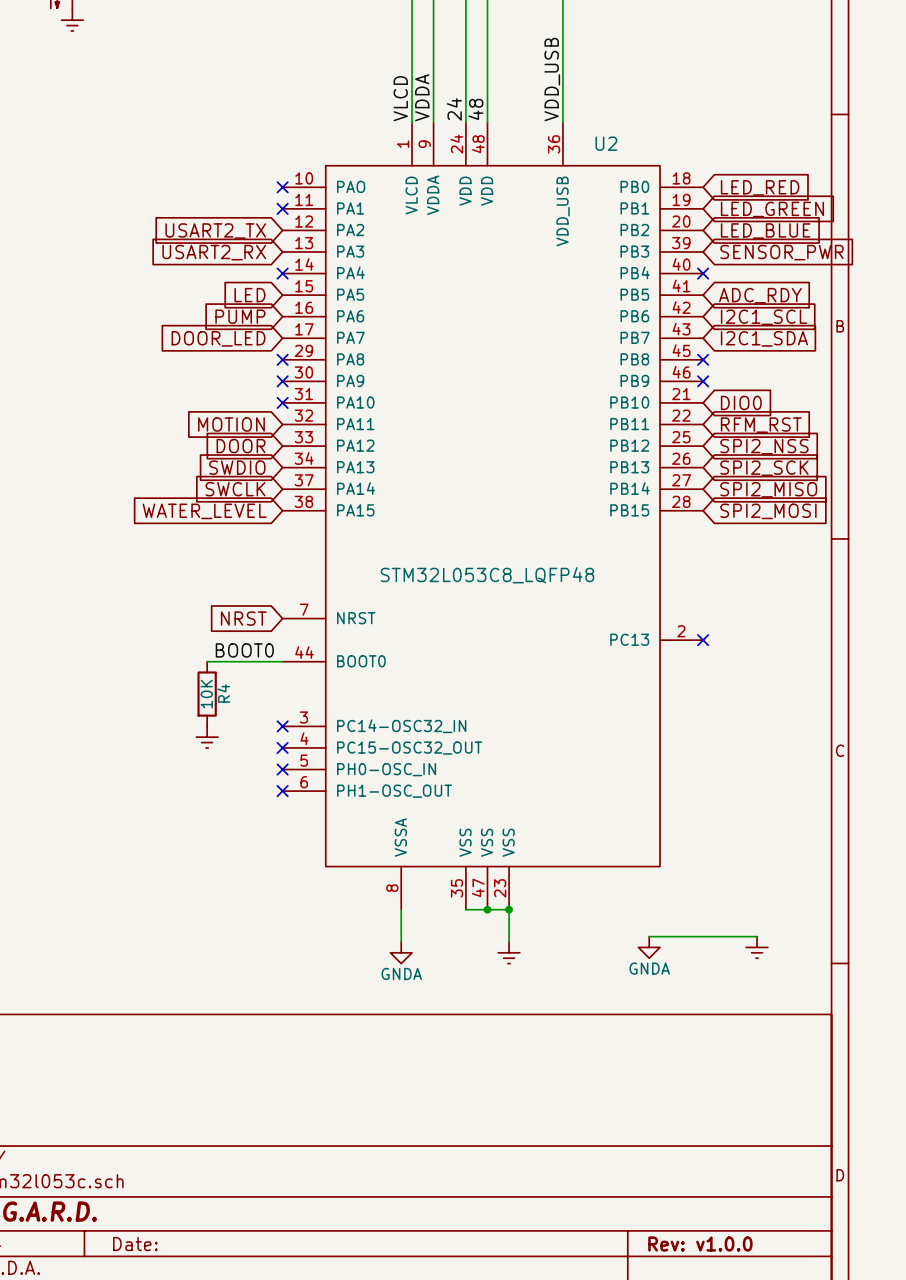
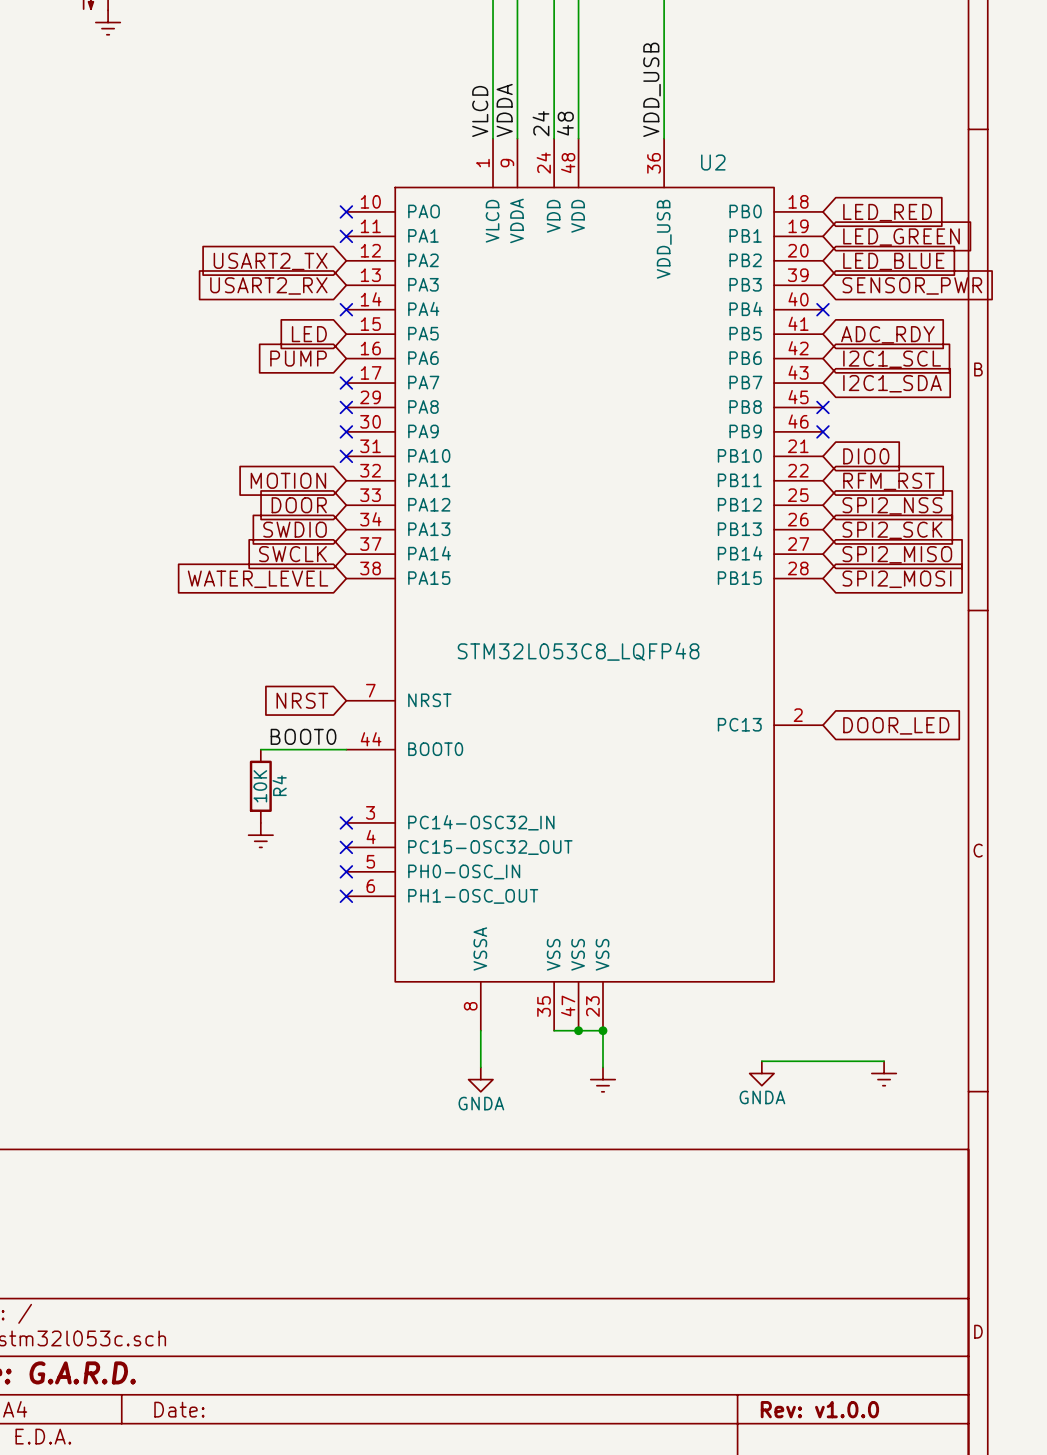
global label: DOOR_LED (218, 338) -> none
no-connect mark: none -> (346, 383)
no-connect mark: (703, 640) -> none
global label: none -> DOOR_LED (896, 725)

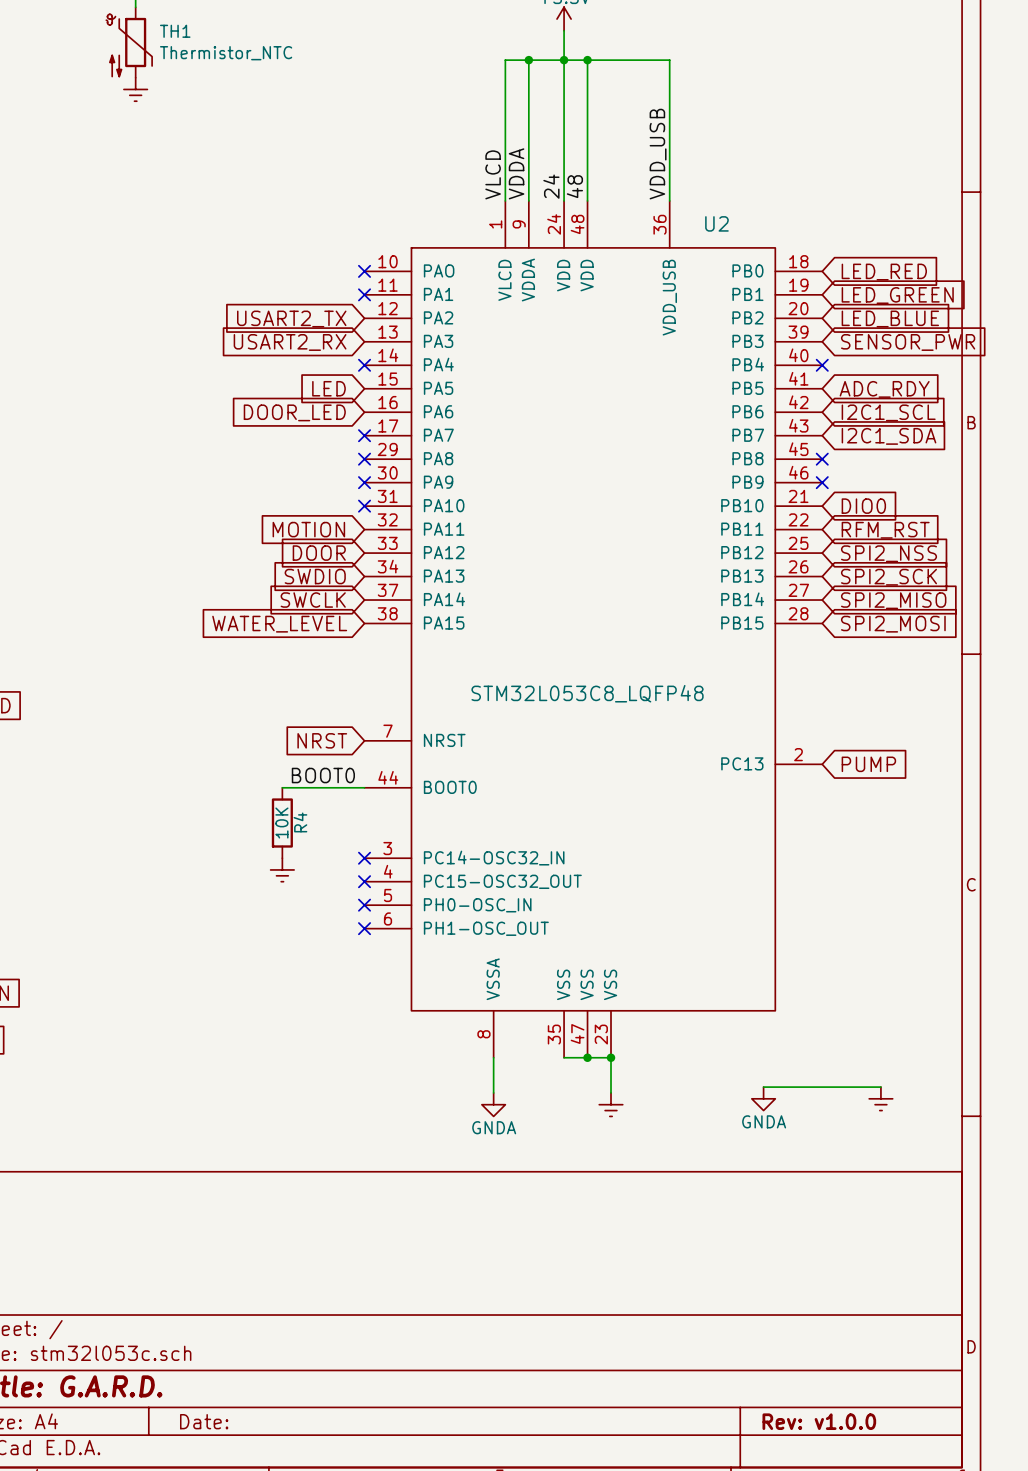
global label: PUMP (298, 358) -> DOOR_LED (294, 412)
global label: DOOR_LED (896, 725) -> PUMP (868, 764)

